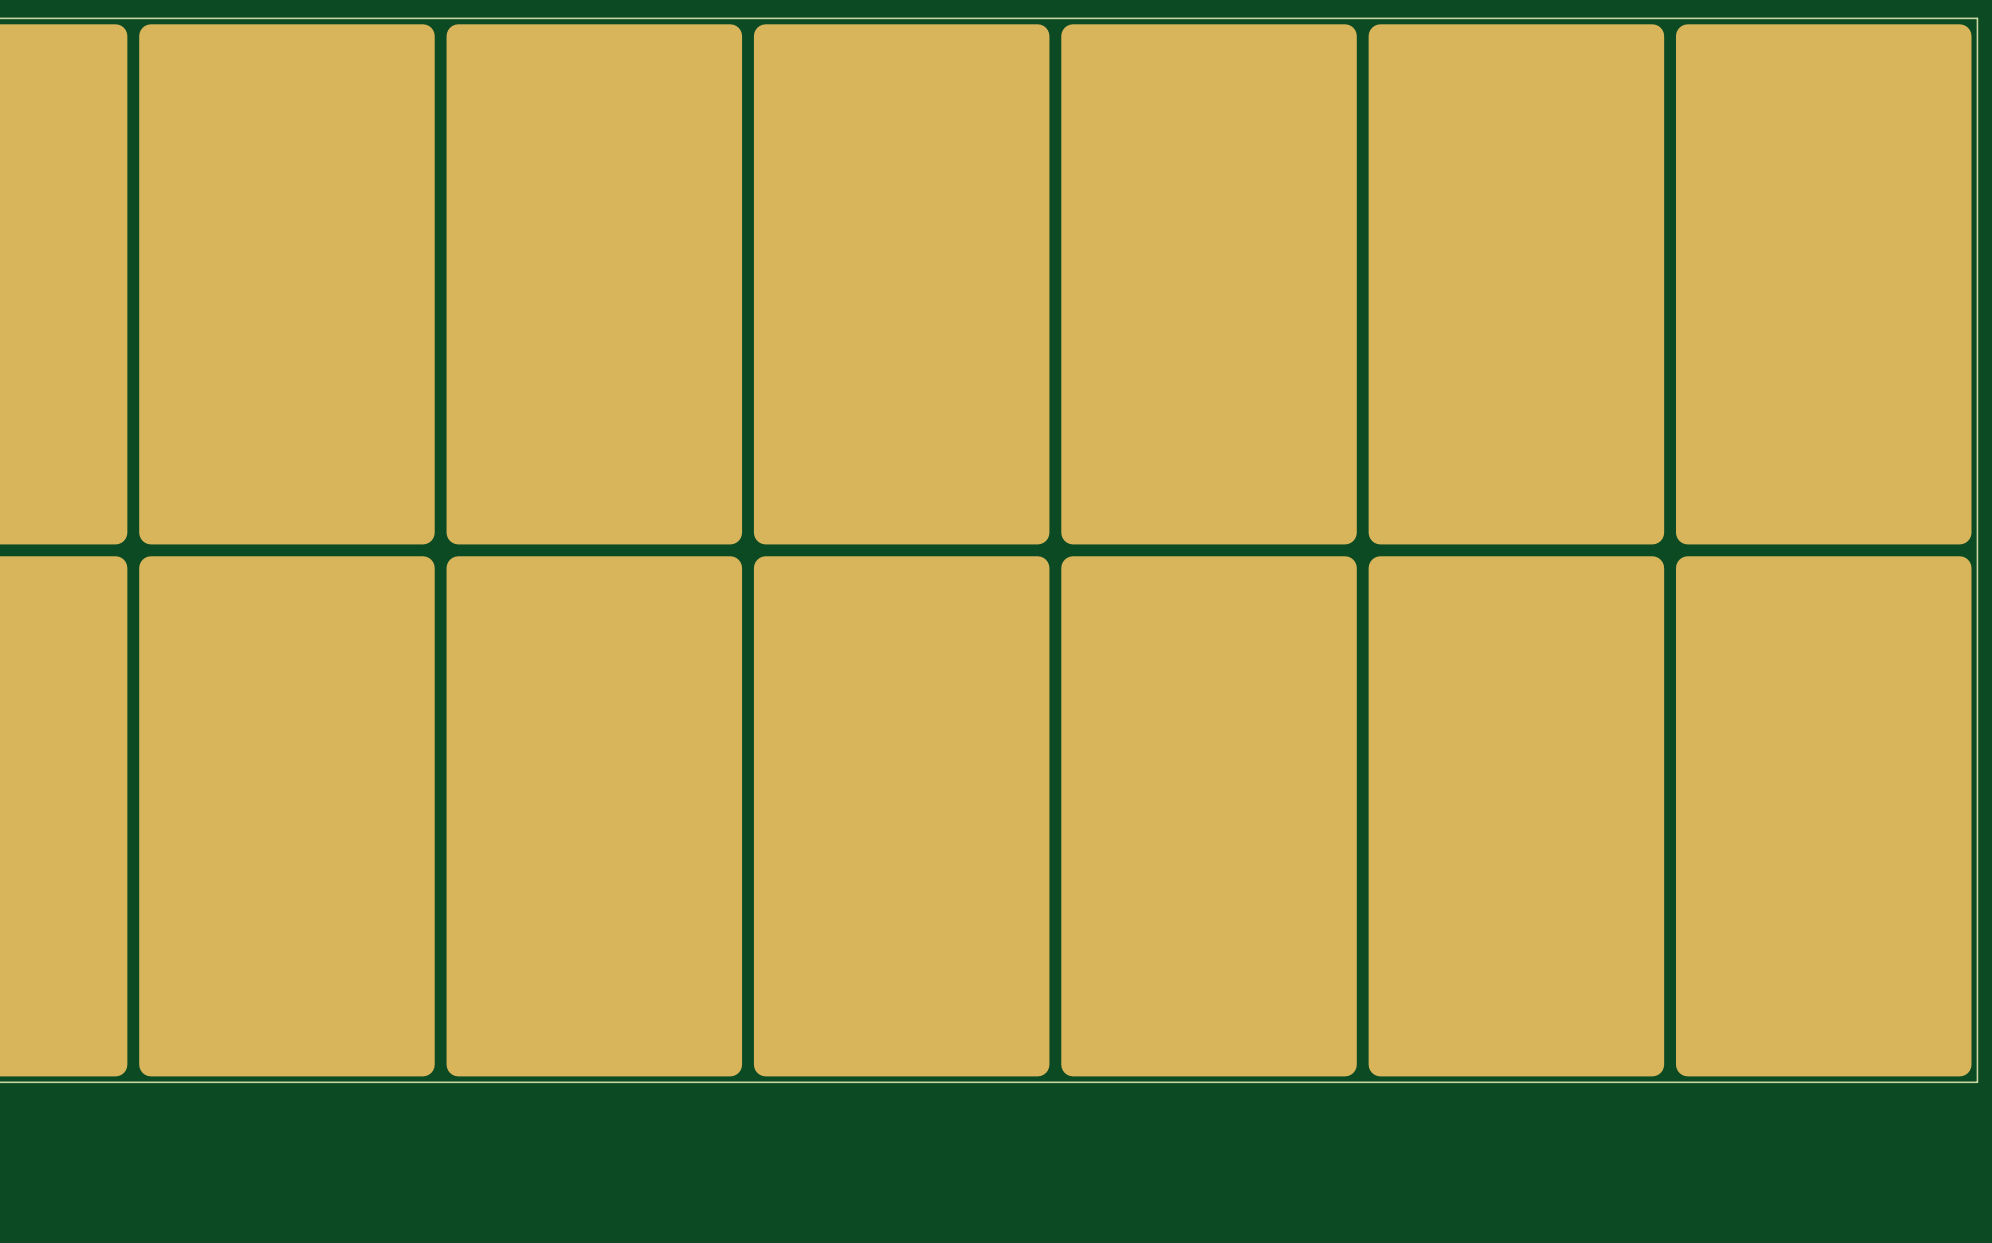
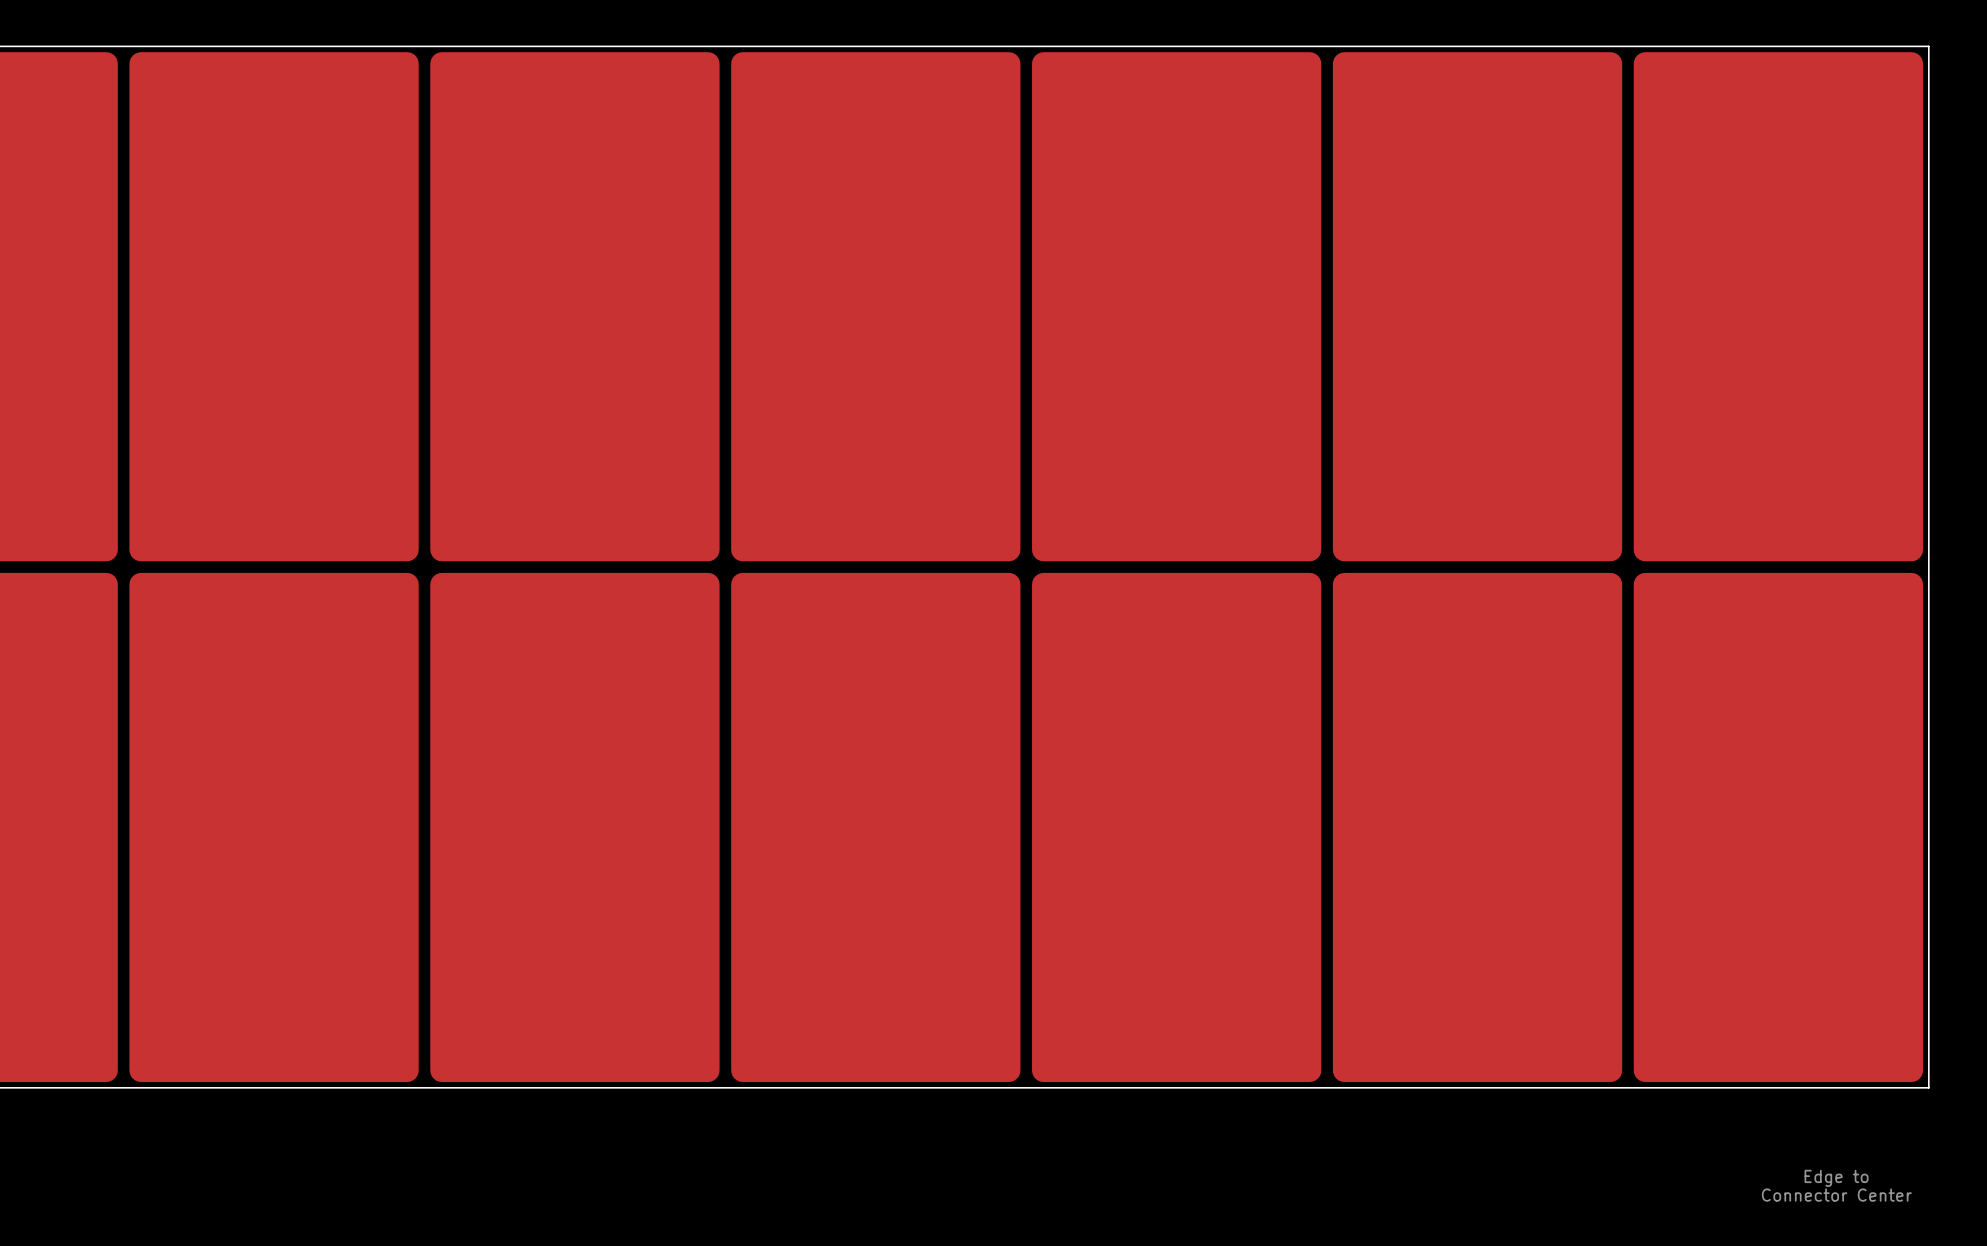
text: none -> Edge to (1836, 1178)
text: none -> Connector Center (1836, 1195)

